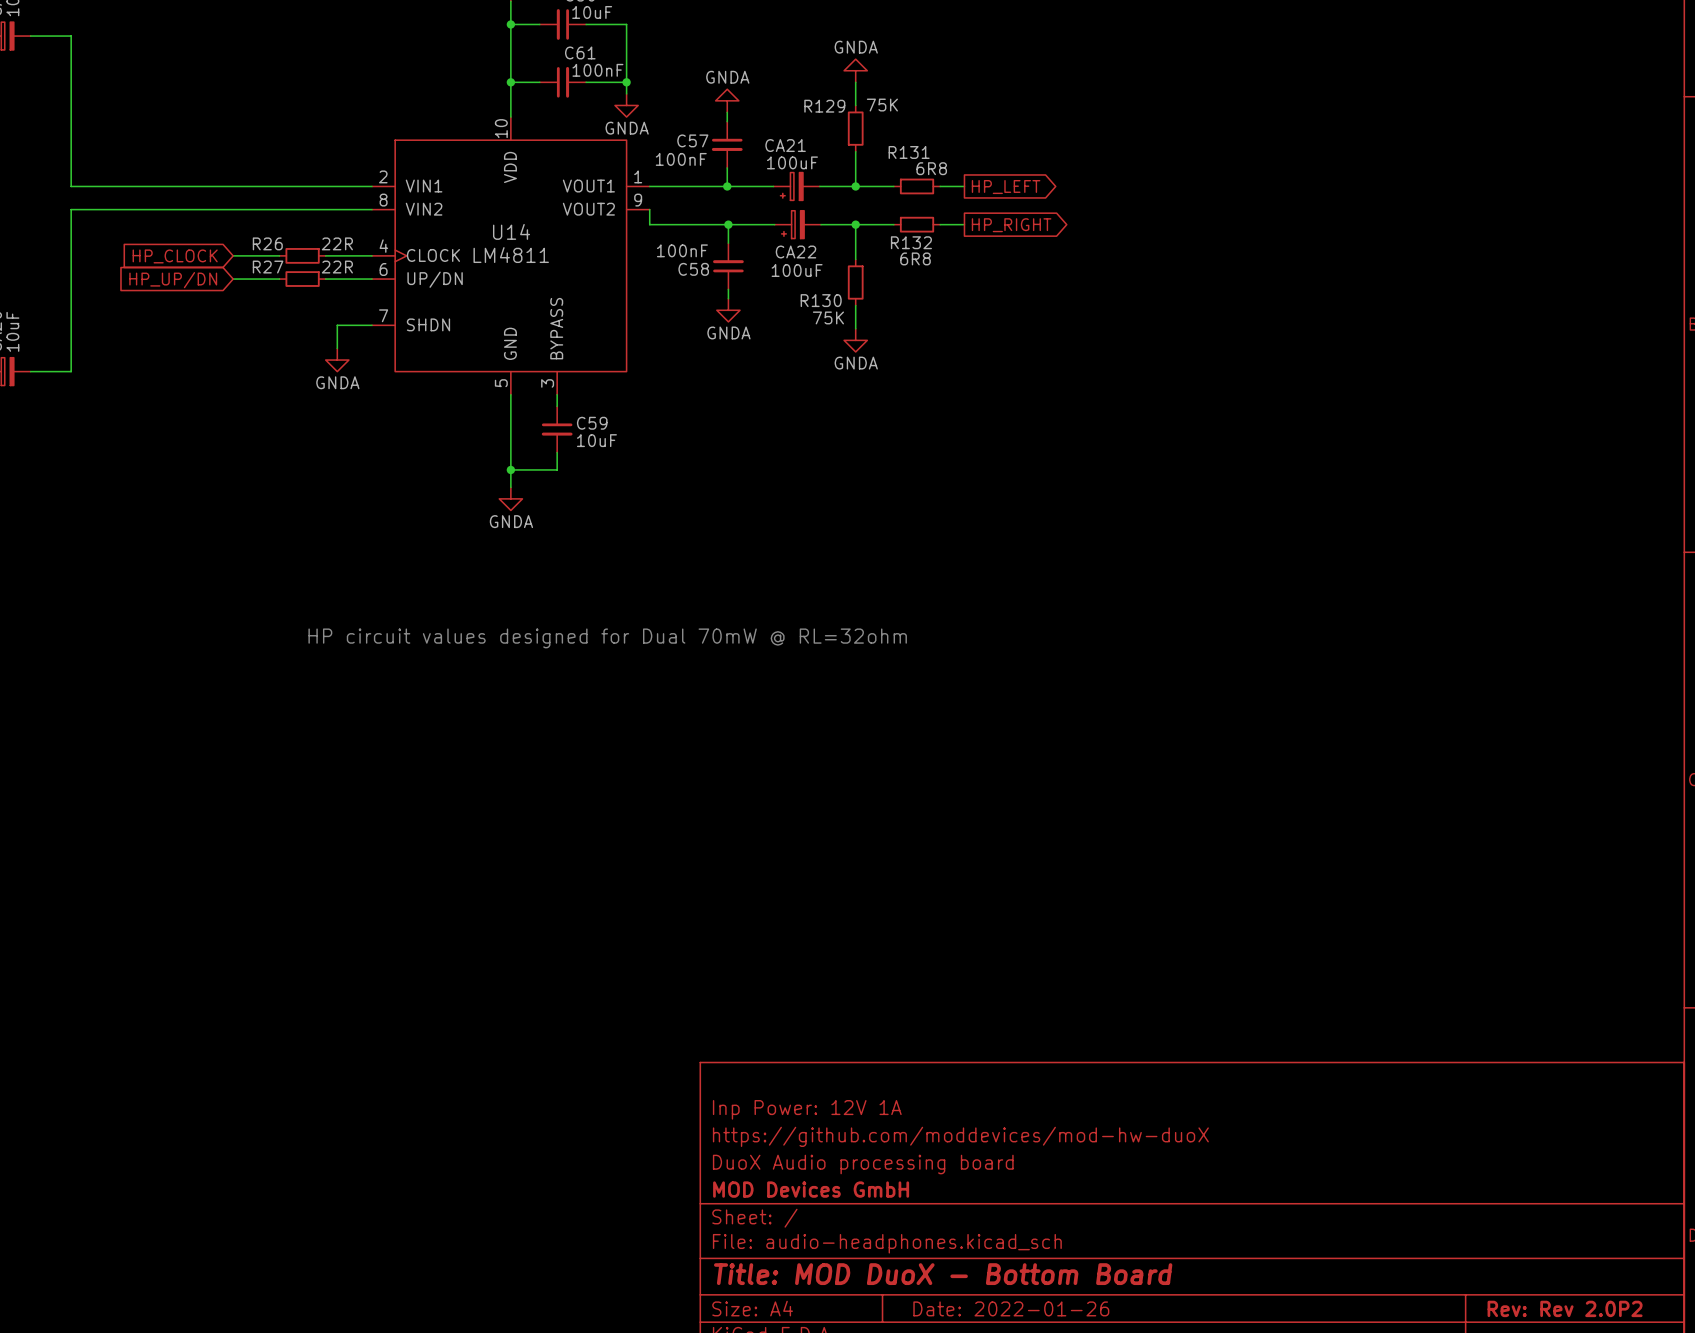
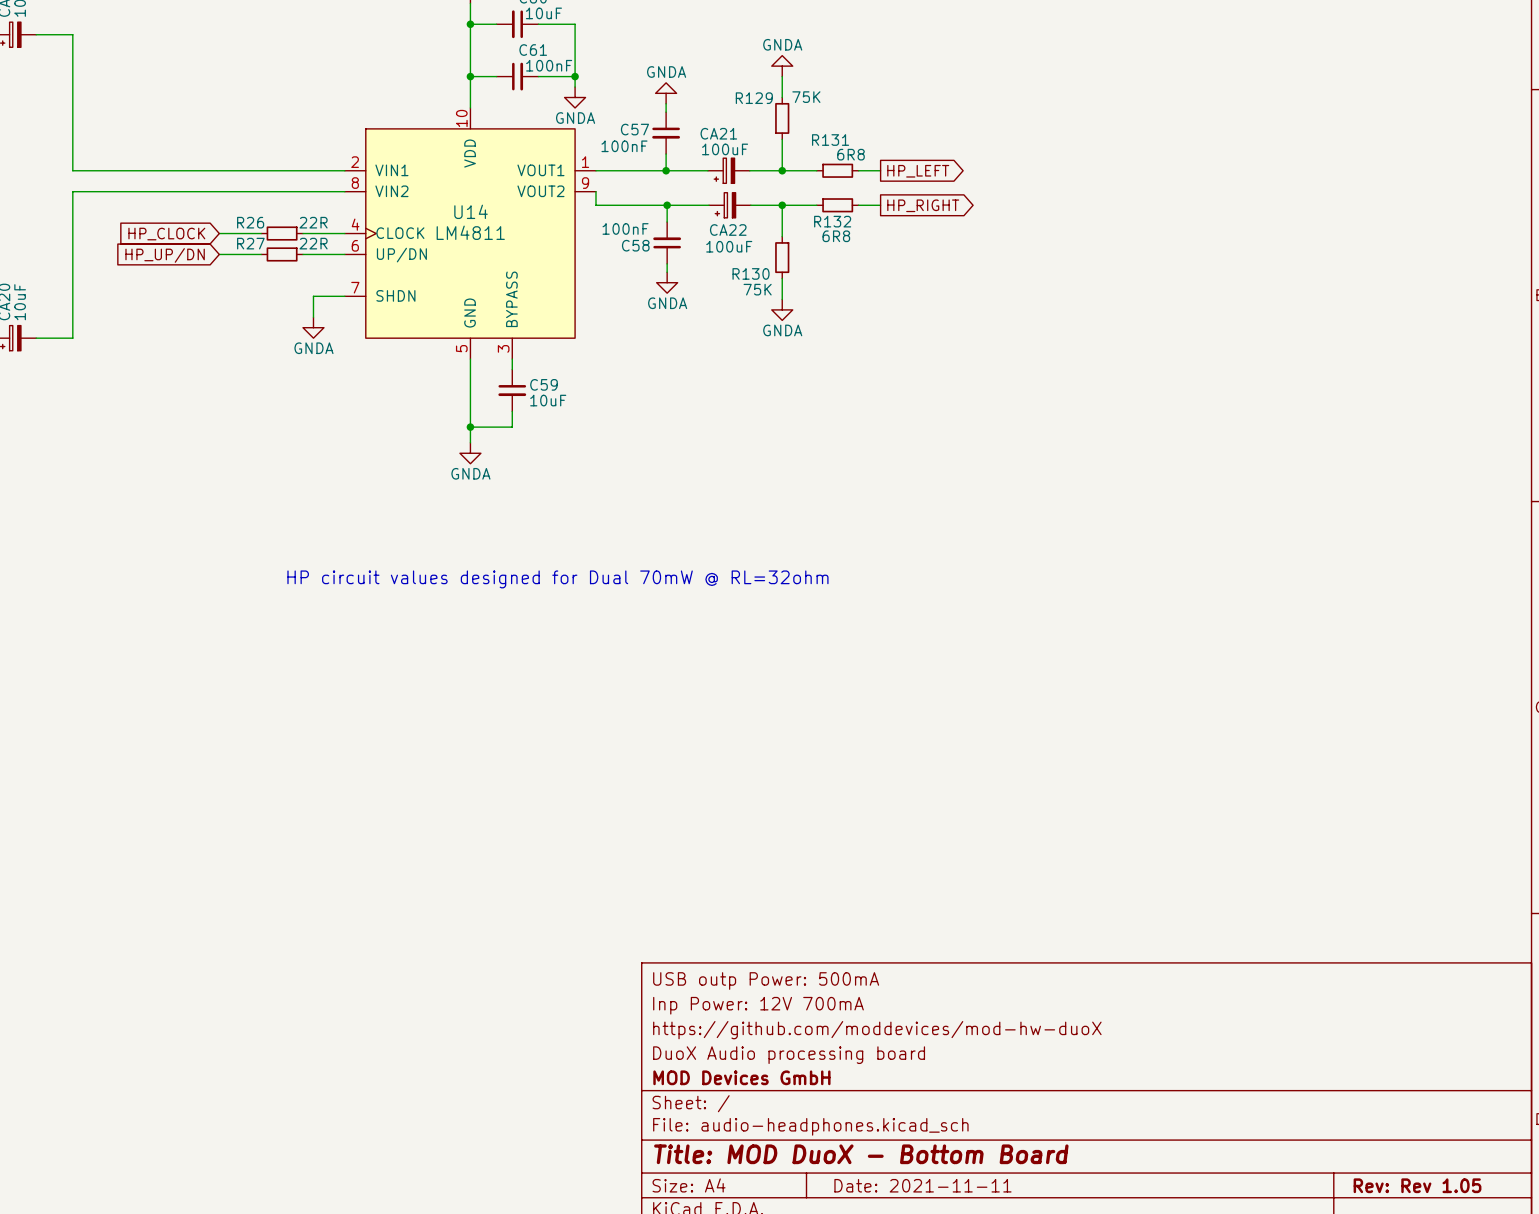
title block: none -> USB outp Power: 500mA (766, 981)
title block: Inp Power: 12V 1A (807, 1109) -> Inp Power: 12V 700mA (758, 1005)
title block: Date: 2022-01-26 (1011, 1308) -> Date: 2021-11-11 (922, 1185)
title block: Rev: Rev 2.0P2 (1565, 1308) -> Rev: Rev 1.05 (1417, 1185)

